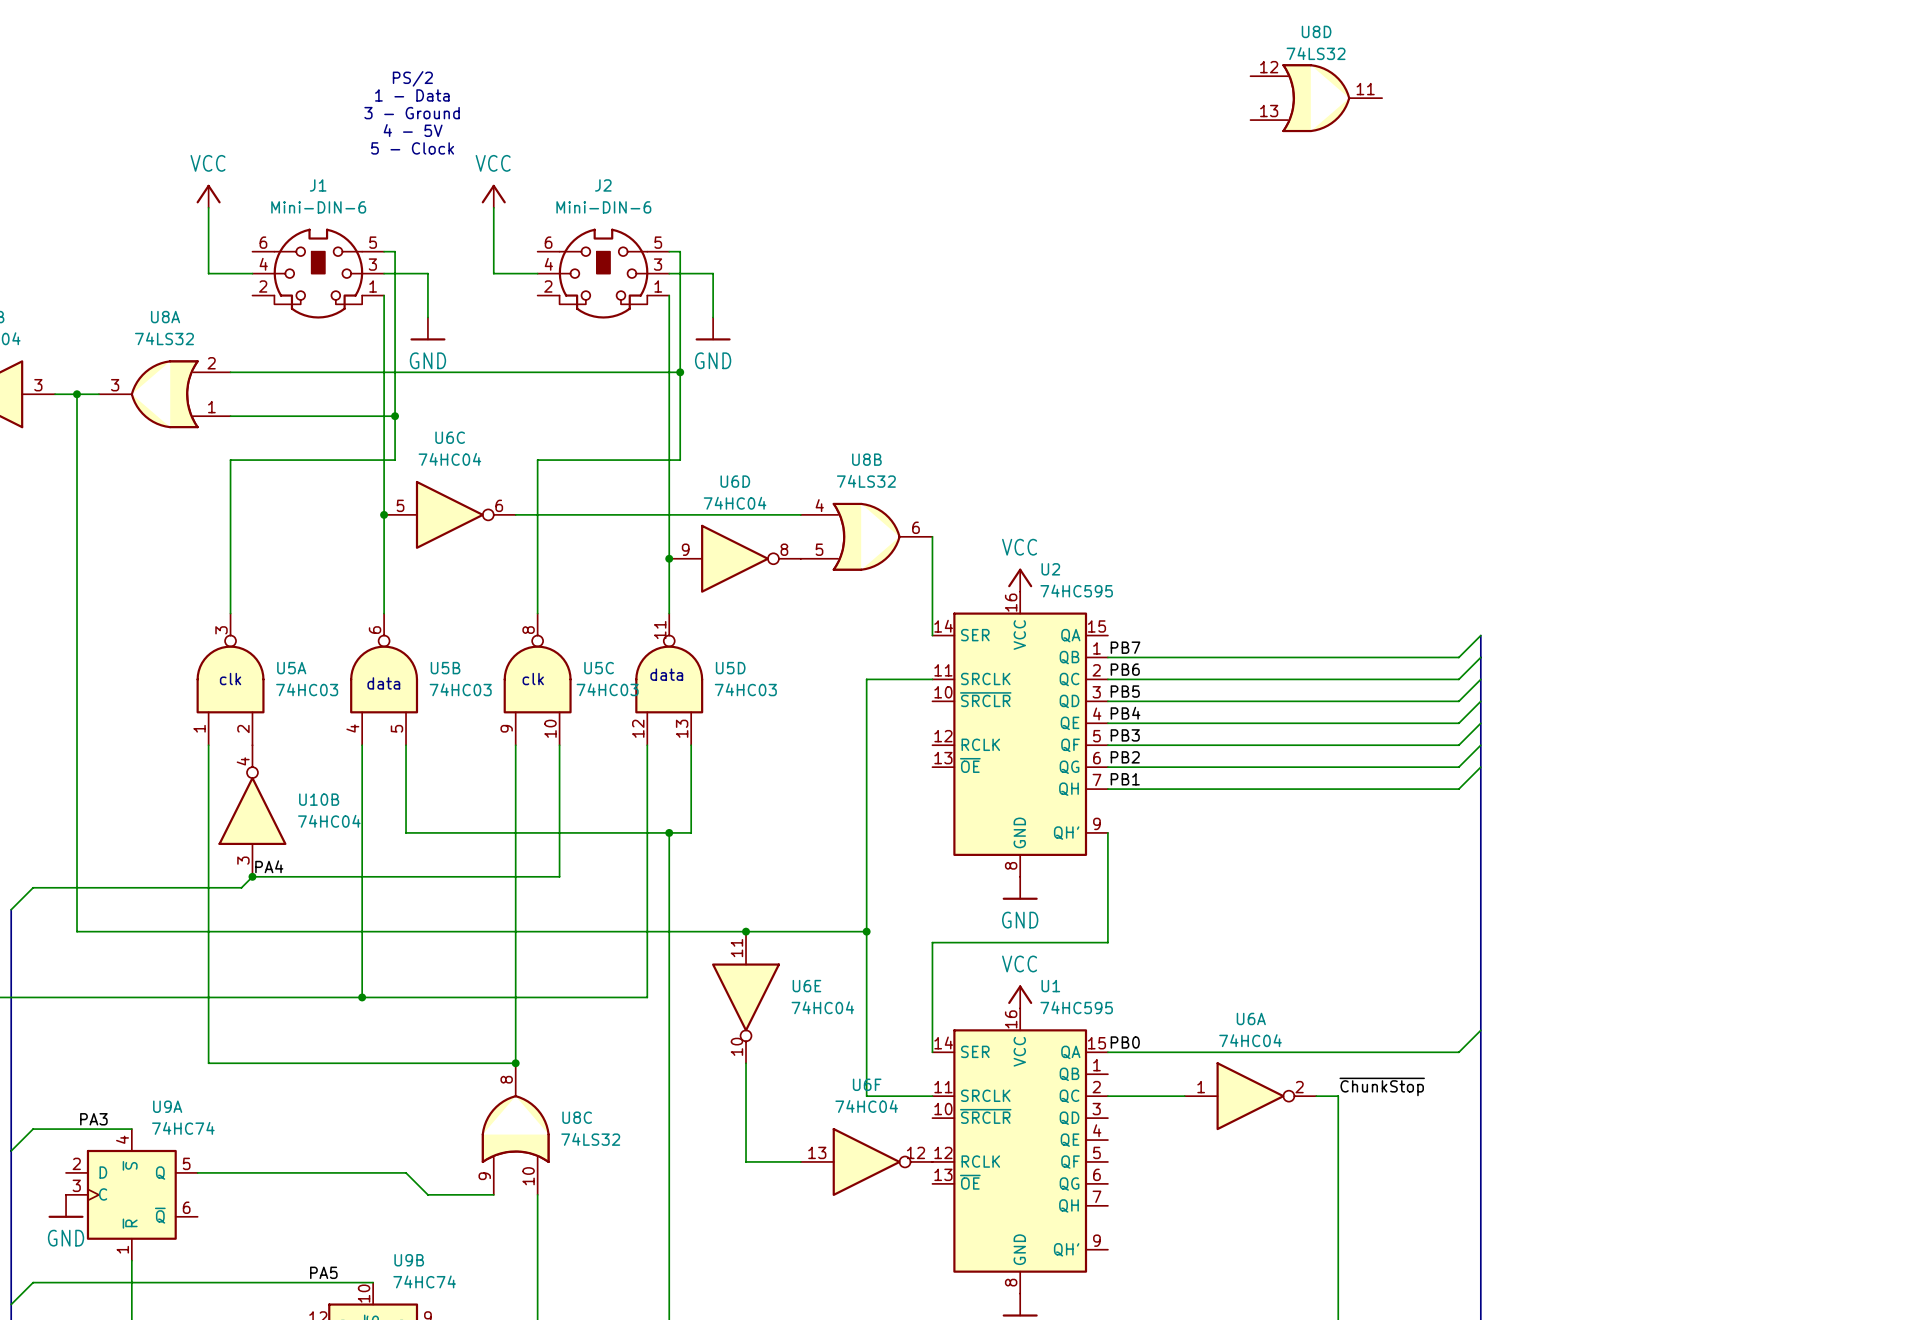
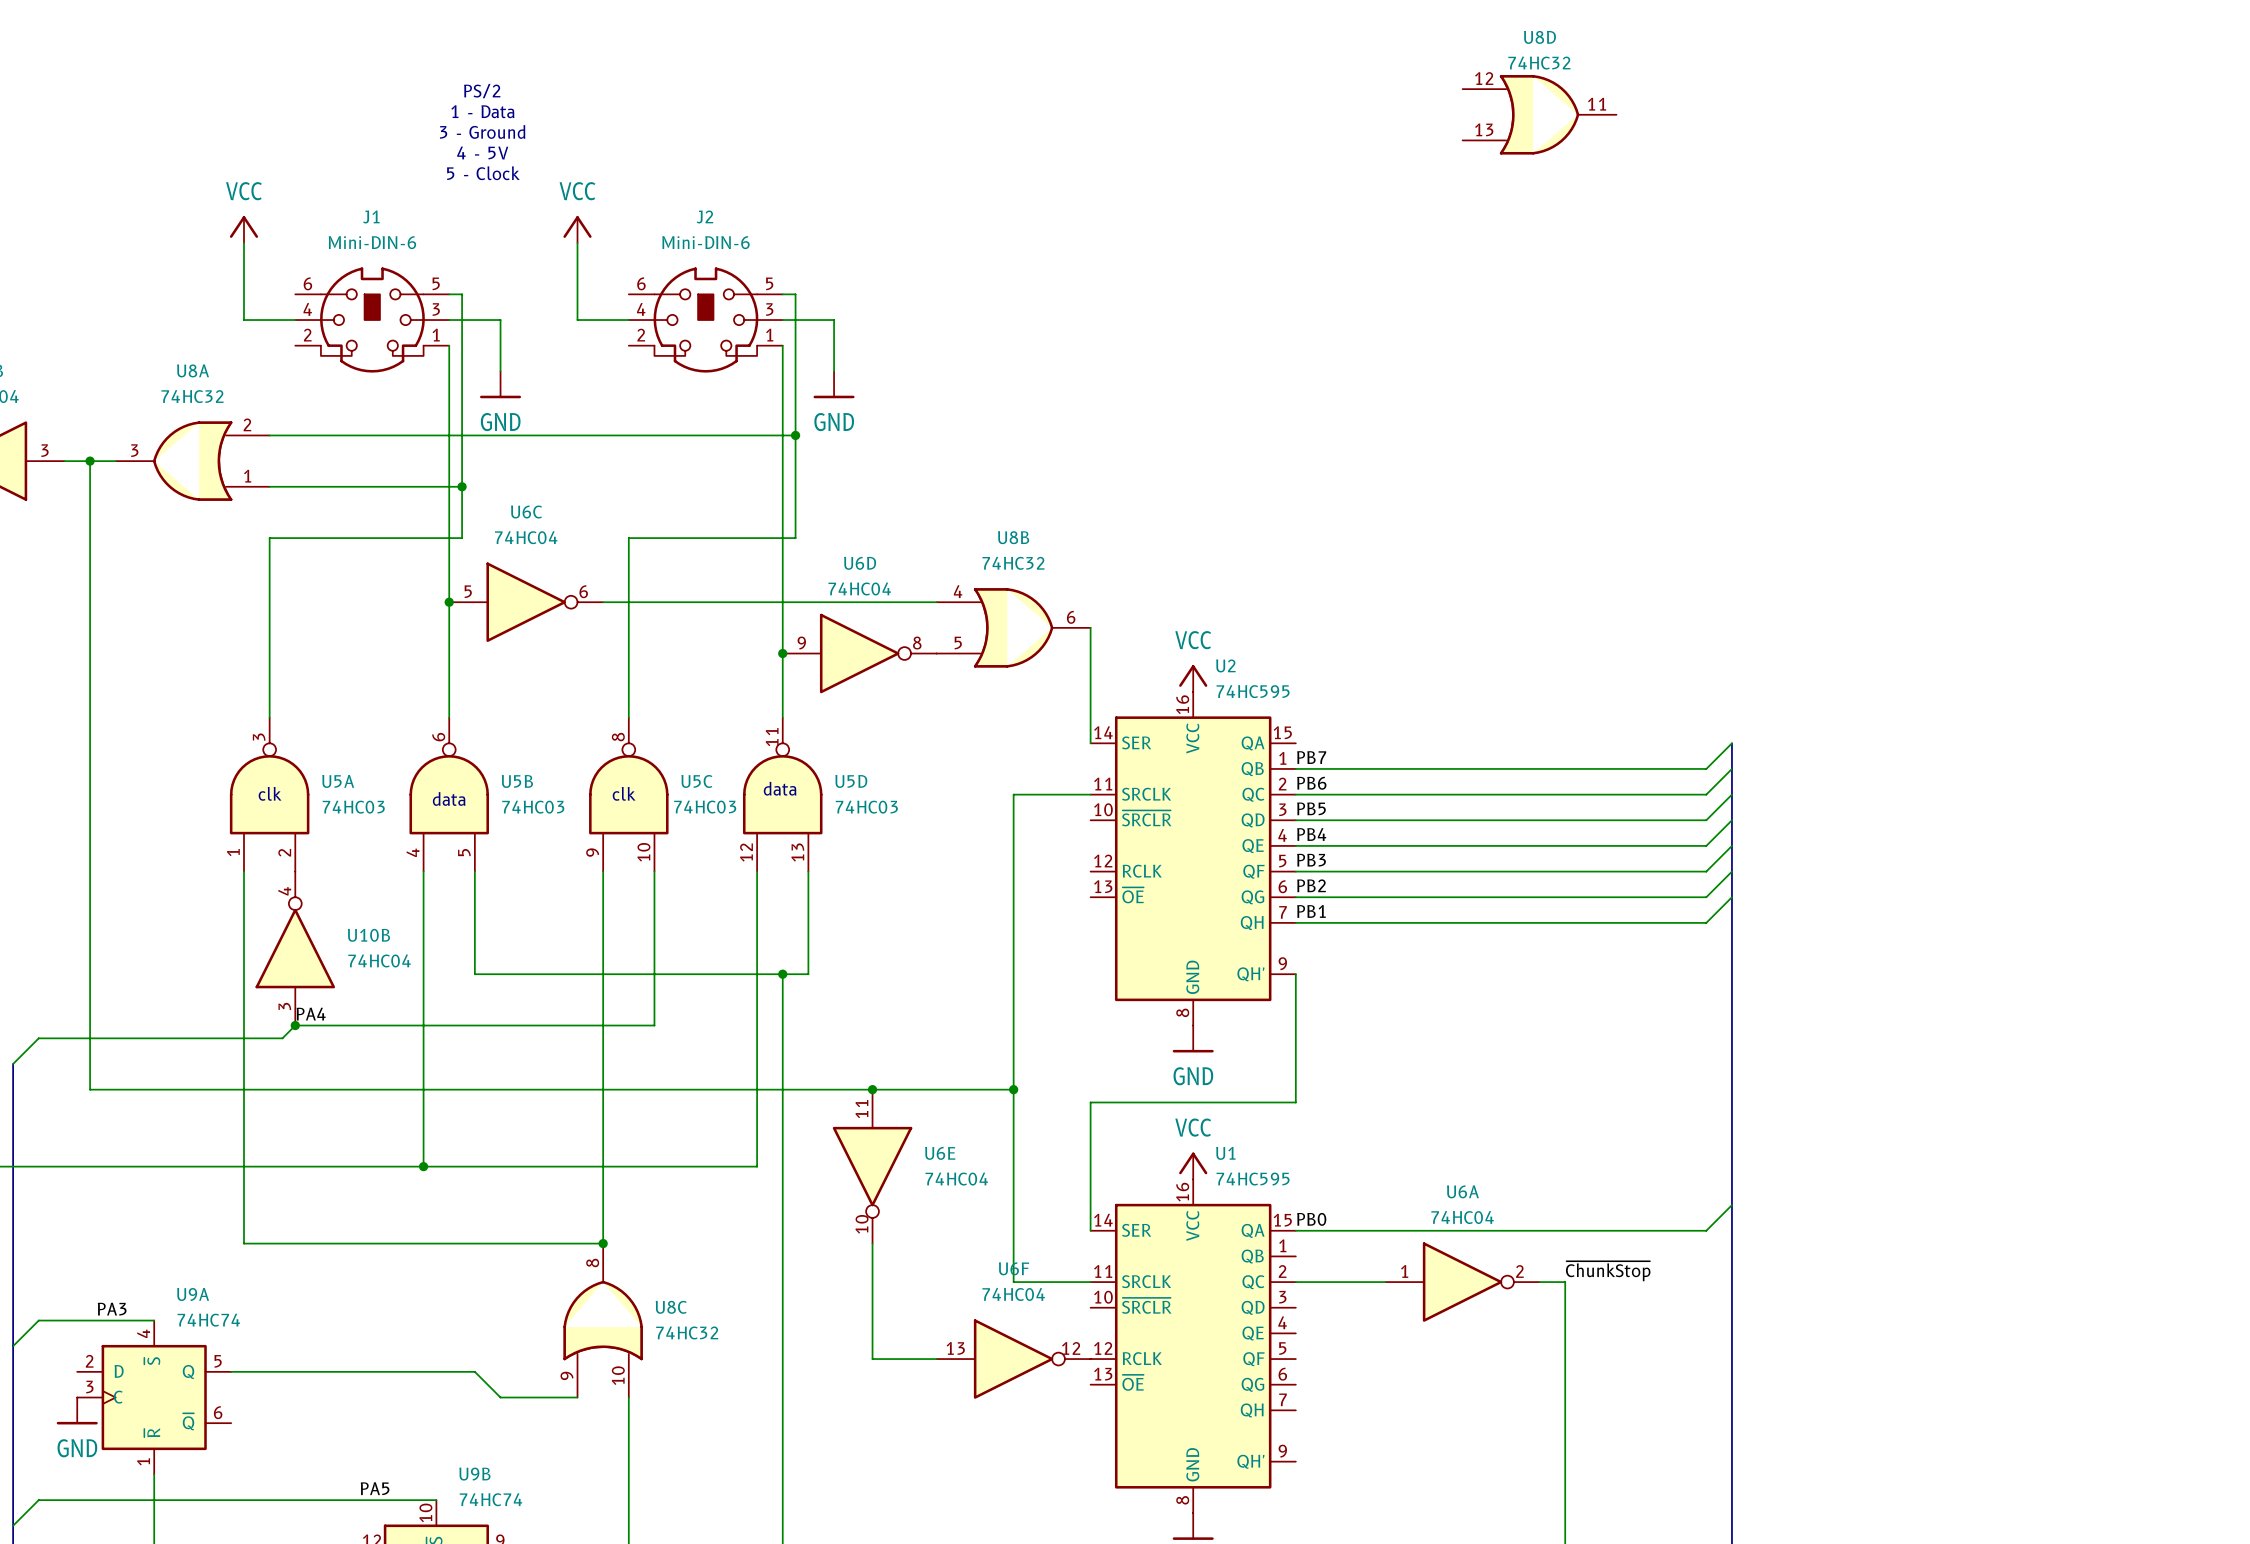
U8D value: 74LS32 (1316, 53) -> 74HC32 (1539, 63)
U8A value: 74LS32 (164, 338) -> 74HC32 (192, 396)
U8B value: 74LS32 (866, 481) -> 74HC32 (1013, 563)
U8C value: 74LS32 (590, 1139) -> 74HC32 (687, 1332)

